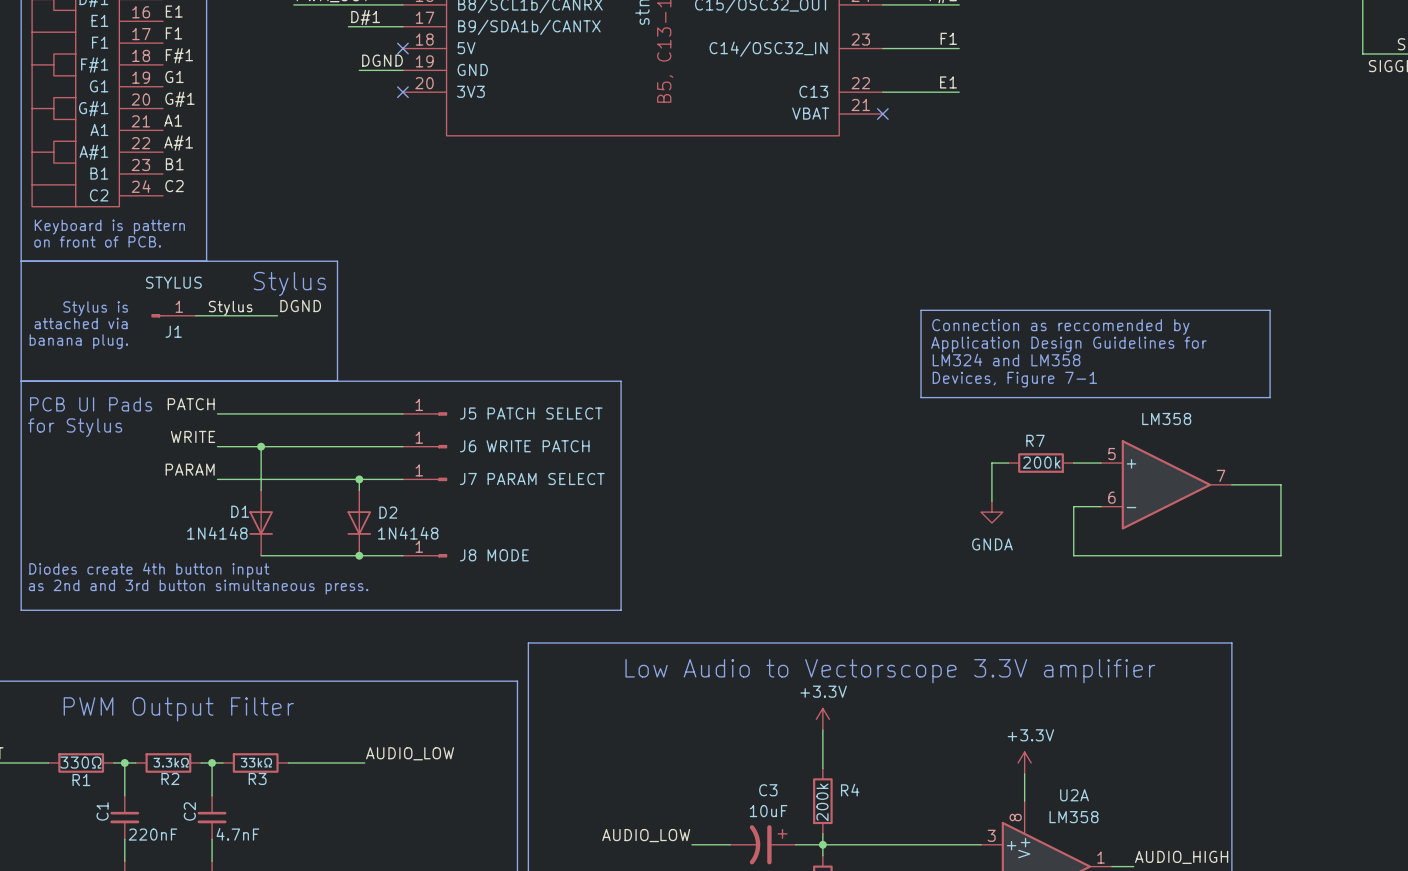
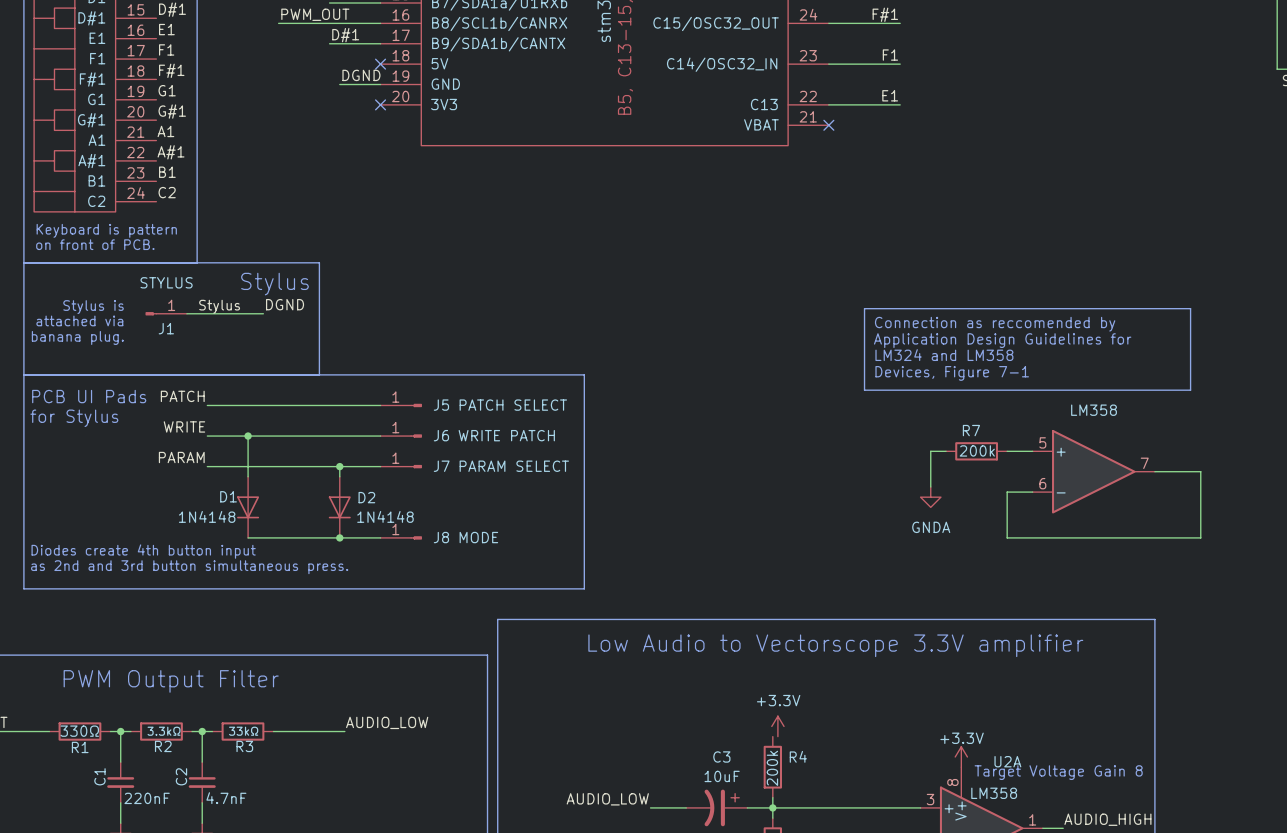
power symbol position: +3.3V (822, 719) -> +3.3V (777, 726)
wire: (822, 730) (822, 768) -> none
power symbol text position: +3.3V (1030, 735) -> +3.3V (962, 738)
power symbol position: +3.3V (1024, 762) -> +3.3V (961, 757)
text: none -> Target Voltage Gain 8 (1058, 772)
U2A value position: LM358 (1073, 817) -> LM358 (994, 793)

